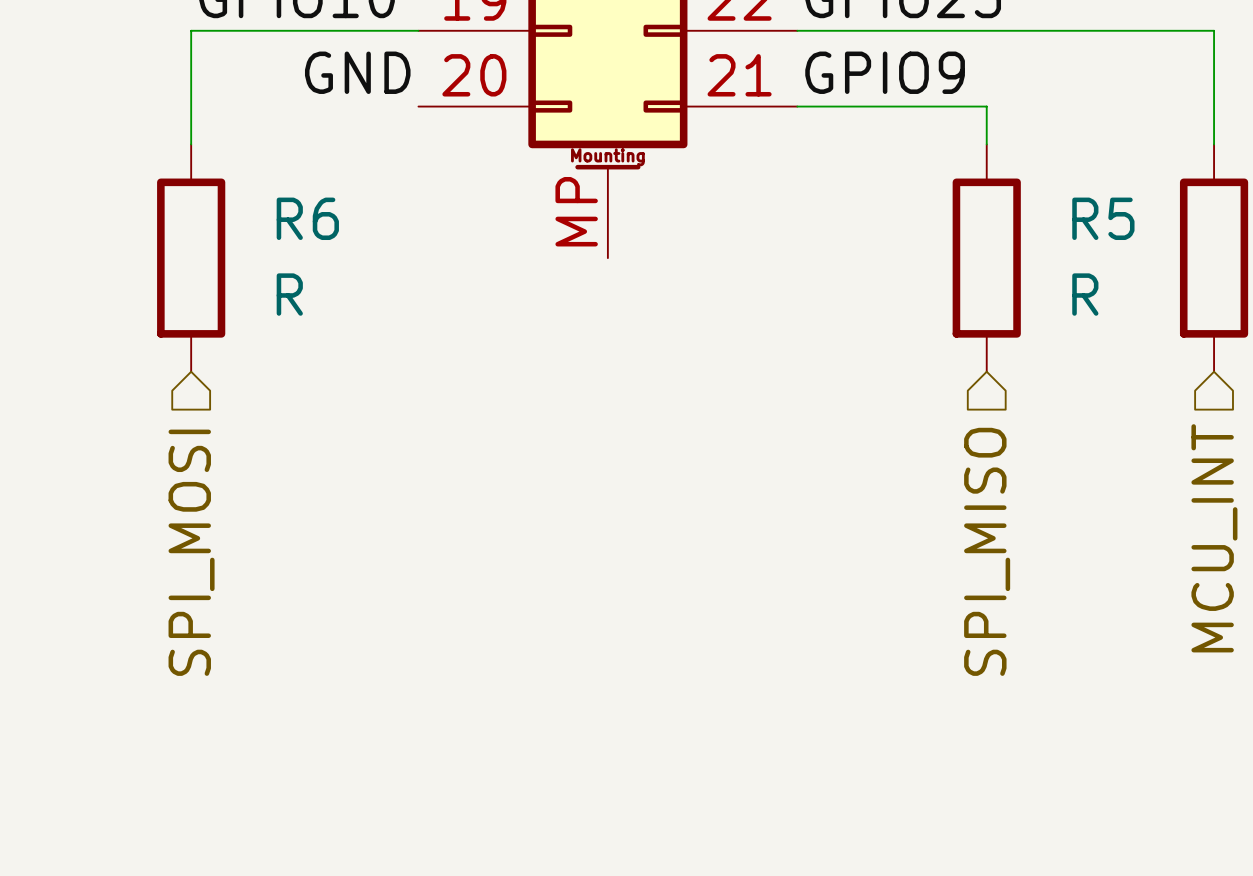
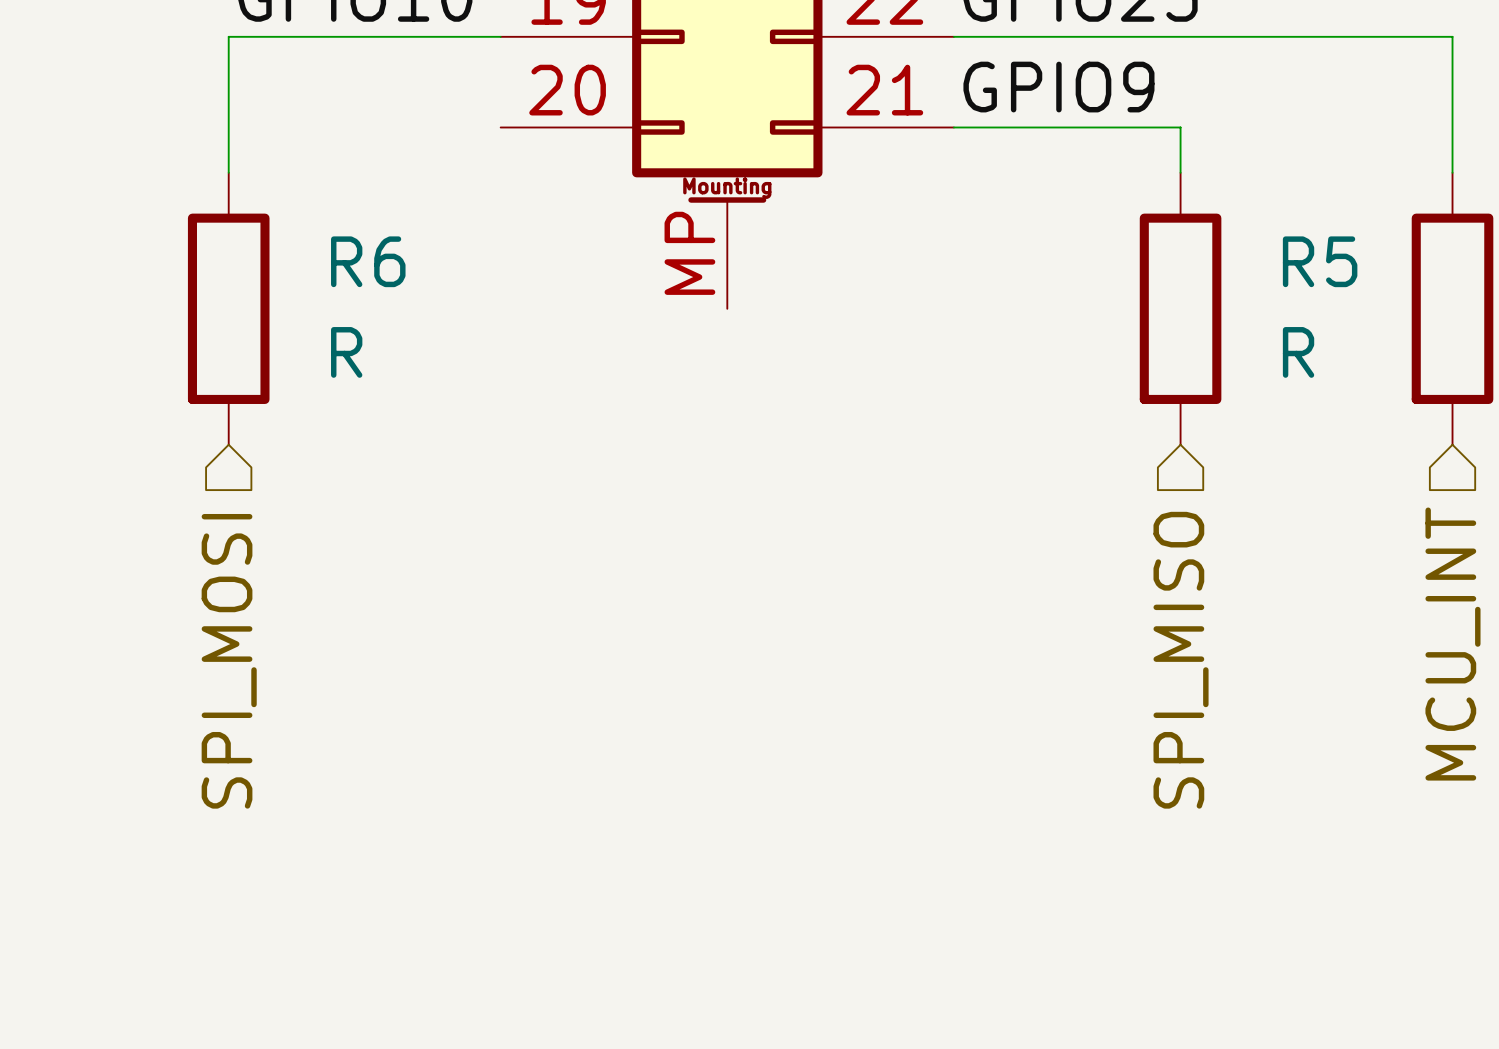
label: GND (357, 72) -> none

